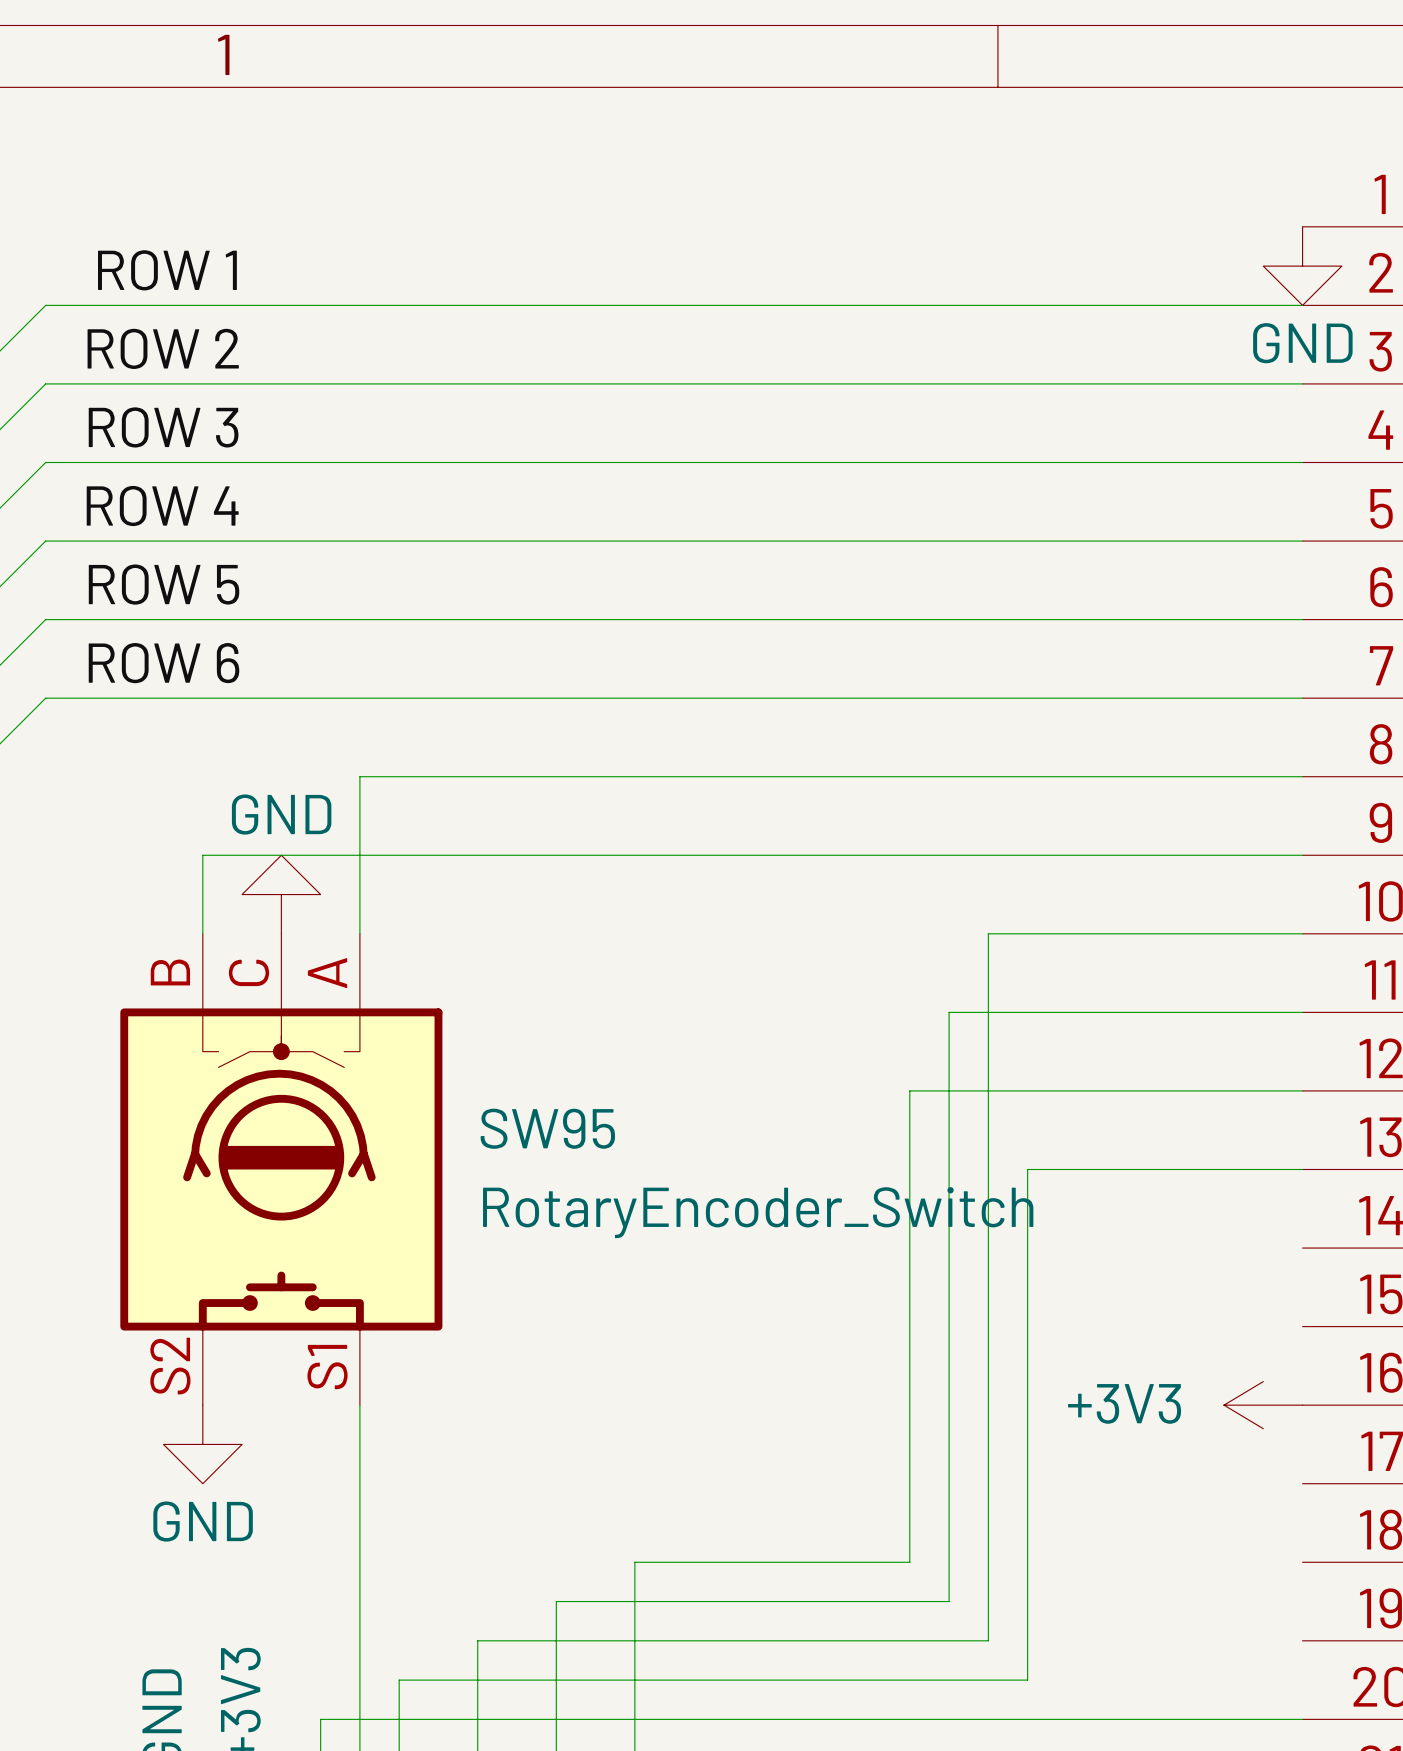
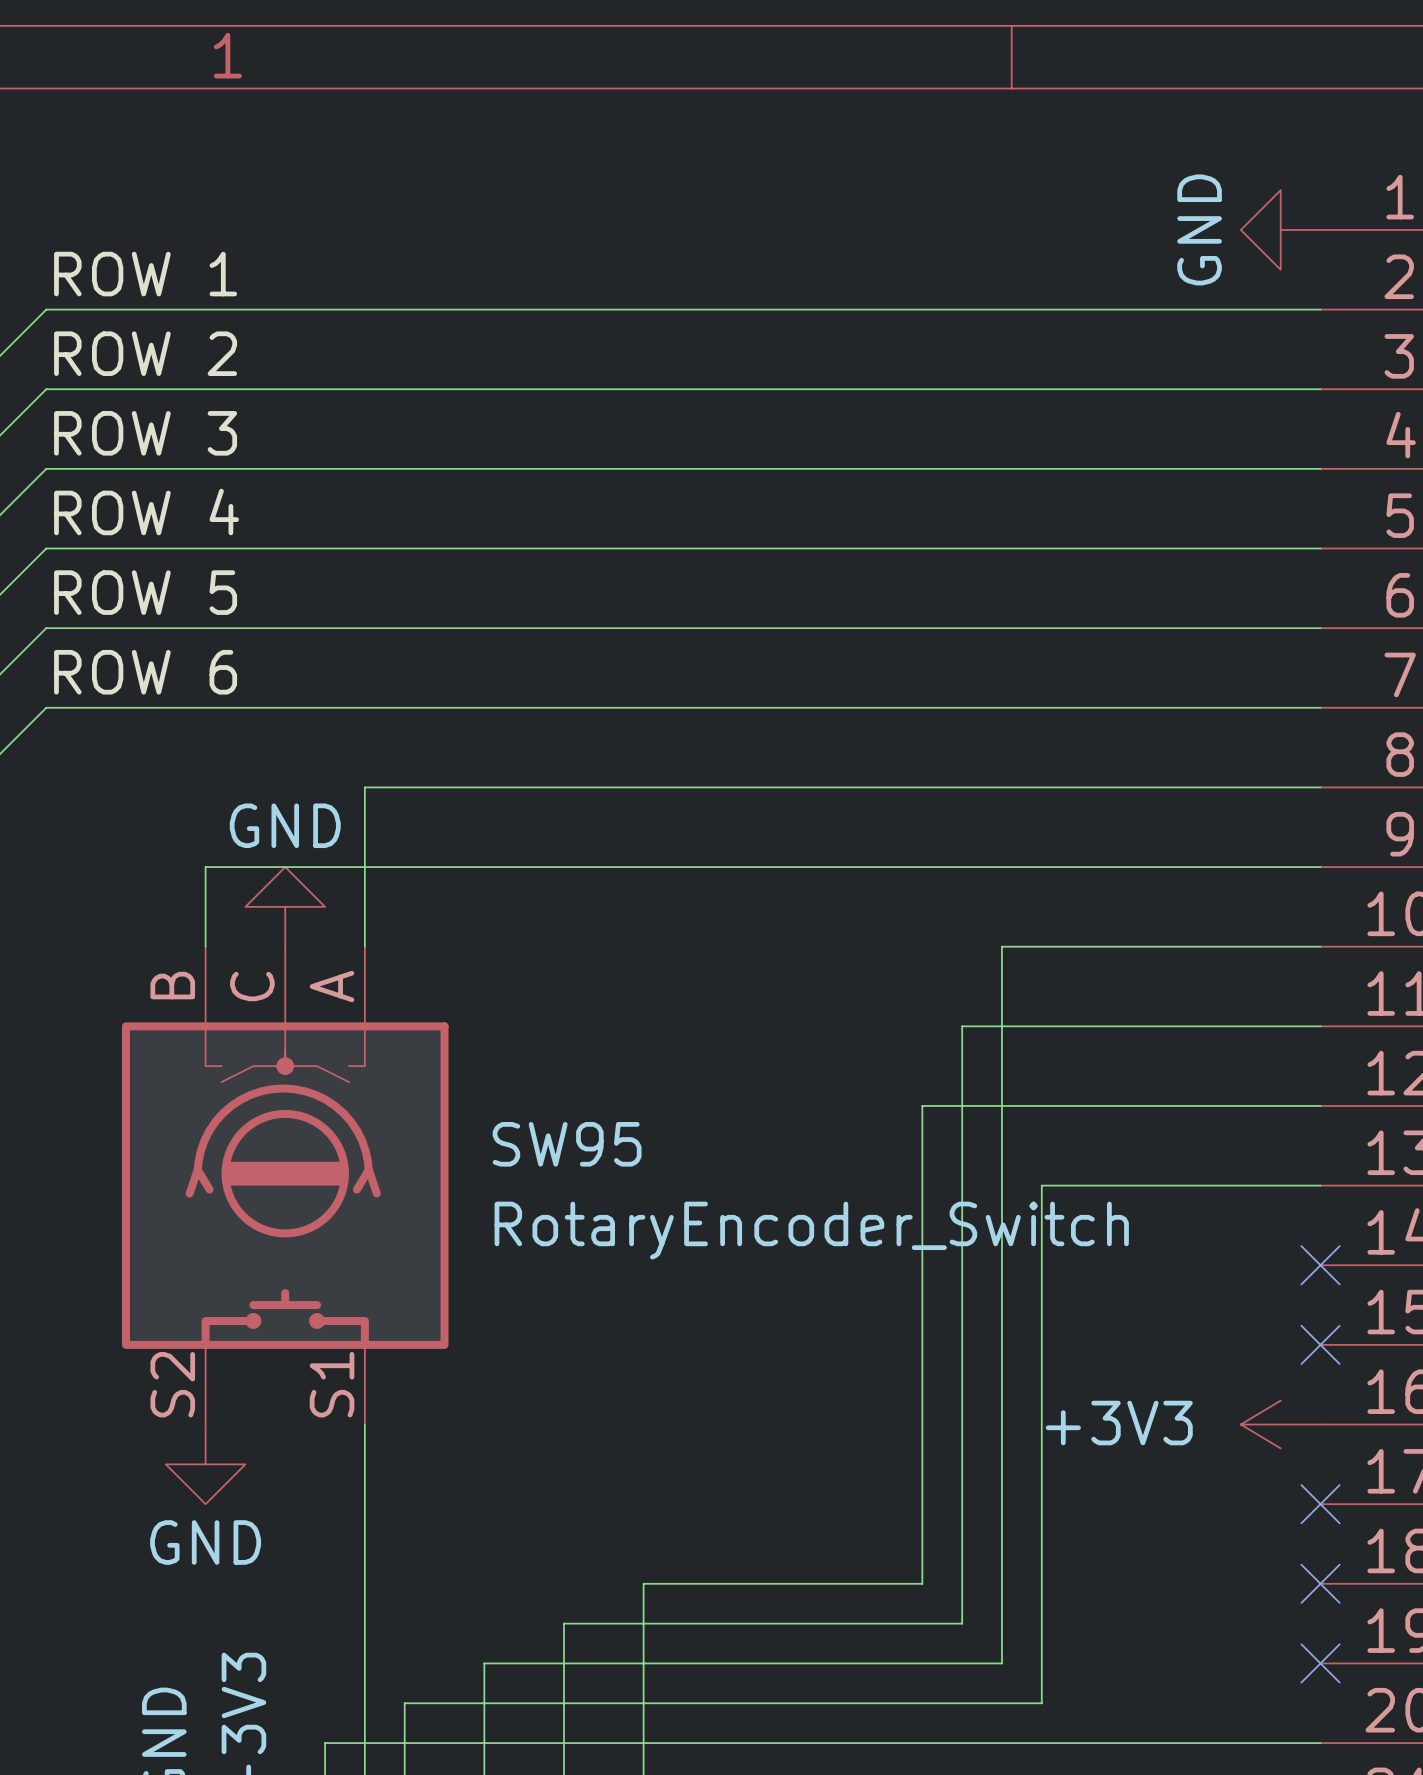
power symbol rotation: 0° (1302, 266) -> 90° clockwise (1280, 229)
power symbol position: GND (1302, 266) -> GND (1280, 229)
no-connect mark: none -> (1320, 1265)
no-connect mark: none -> (1320, 1344)
no-connect mark: none -> (1320, 1504)
no-connect mark: none -> (1320, 1583)
no-connect mark: none -> (1320, 1663)

